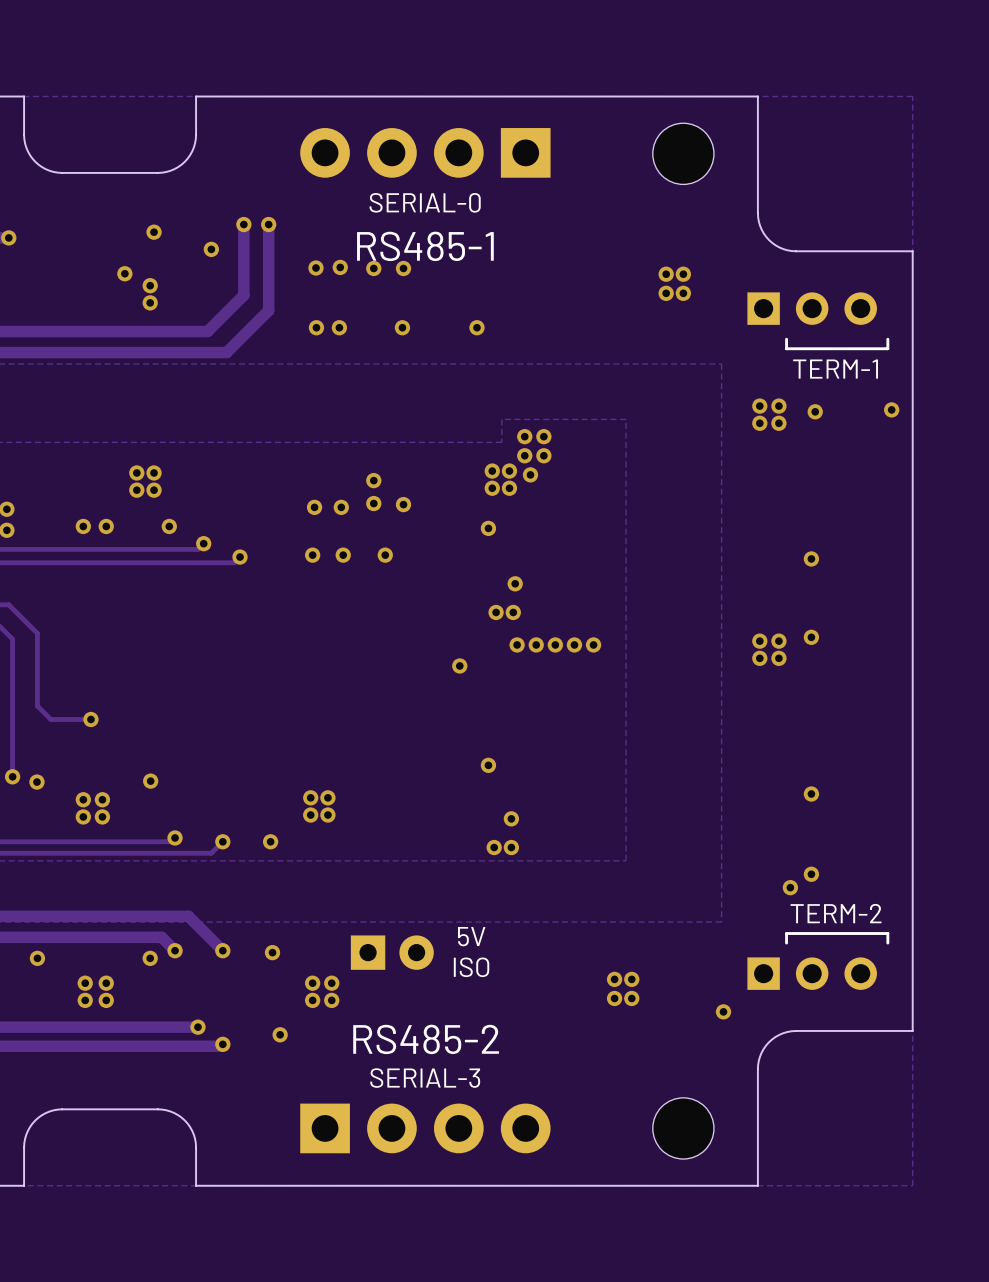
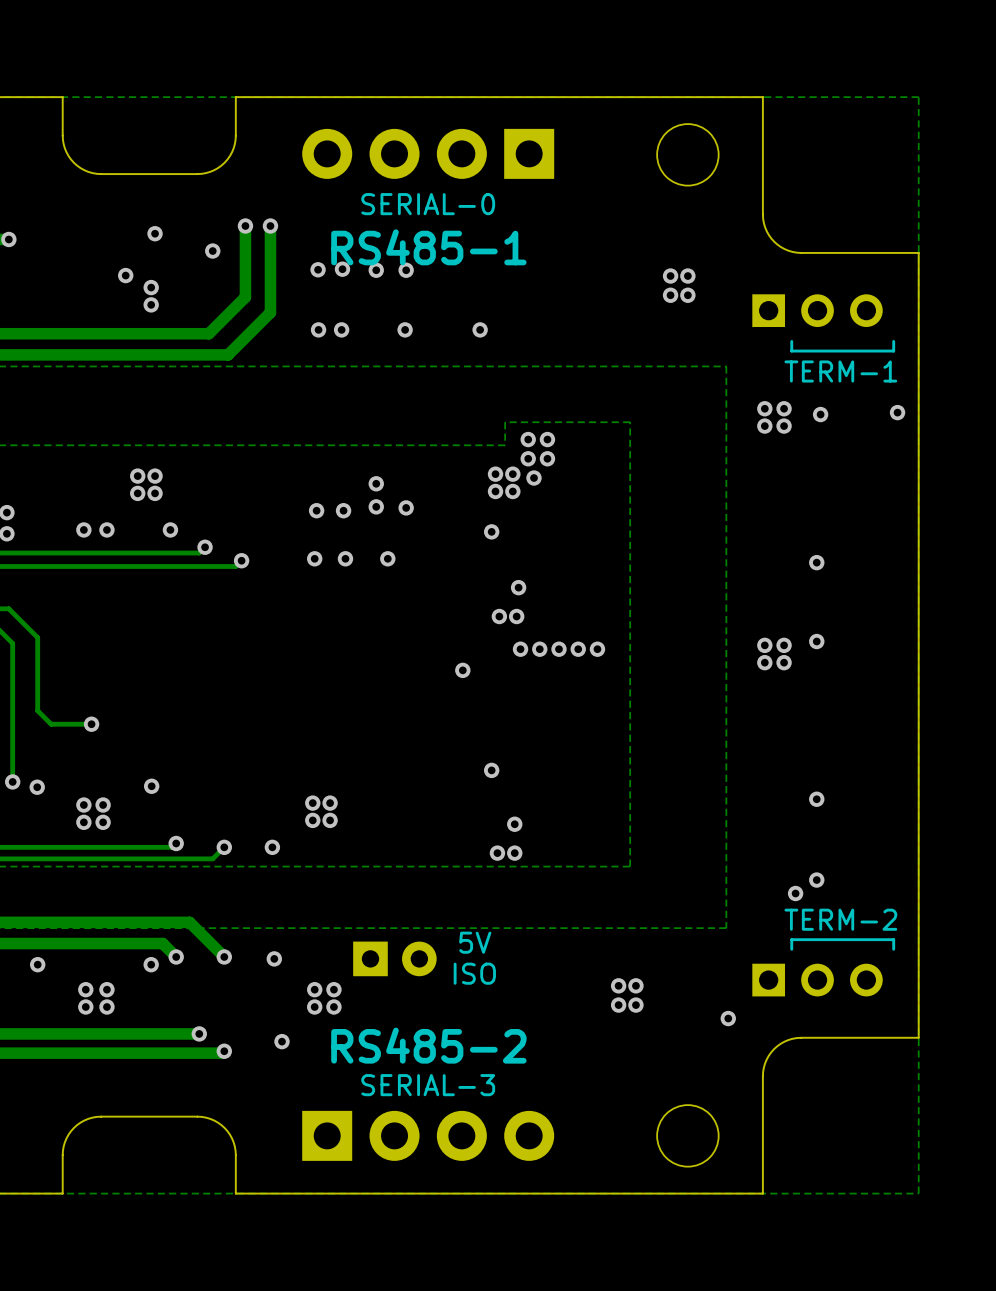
board edge: (24, 96) (25, 143) (35, 161) (53, 171) (100, 172) -> (24, 97) (62, 97) (62, 139) (66, 152) (80, 168) (101, 174)
board edge: (234, 96) (196, 96) (195, 139) (192, 151) (178, 167) (157, 172) -> (235, 97) (234, 144) (224, 162) (205, 173) (158, 174)
board edge: (100, 1109) (53, 1110) (35, 1120) (25, 1139) (24, 1185) -> (101, 1116) (80, 1122) (66, 1138) (62, 1150) (62, 1193) (24, 1193)
board edge: (157, 1109) (178, 1115) (192, 1130) (195, 1143) (196, 1185) (234, 1185) -> (158, 1116) (205, 1117) (224, 1127) (234, 1146) (235, 1193)

